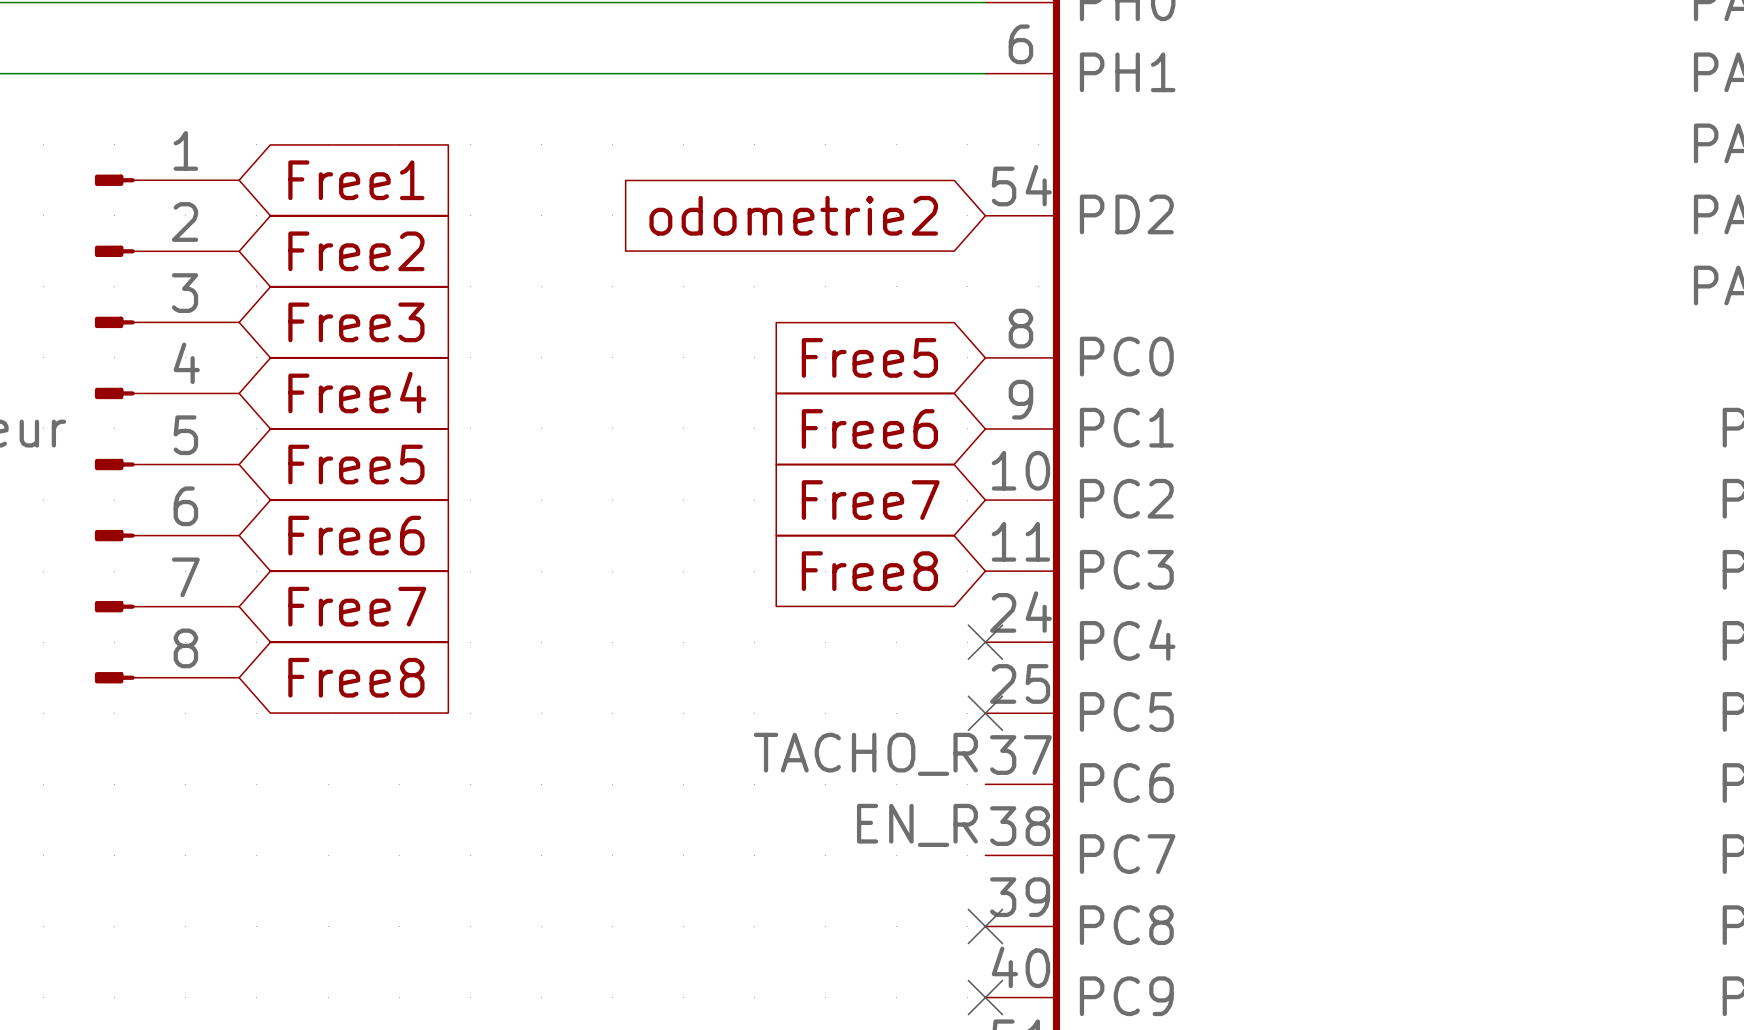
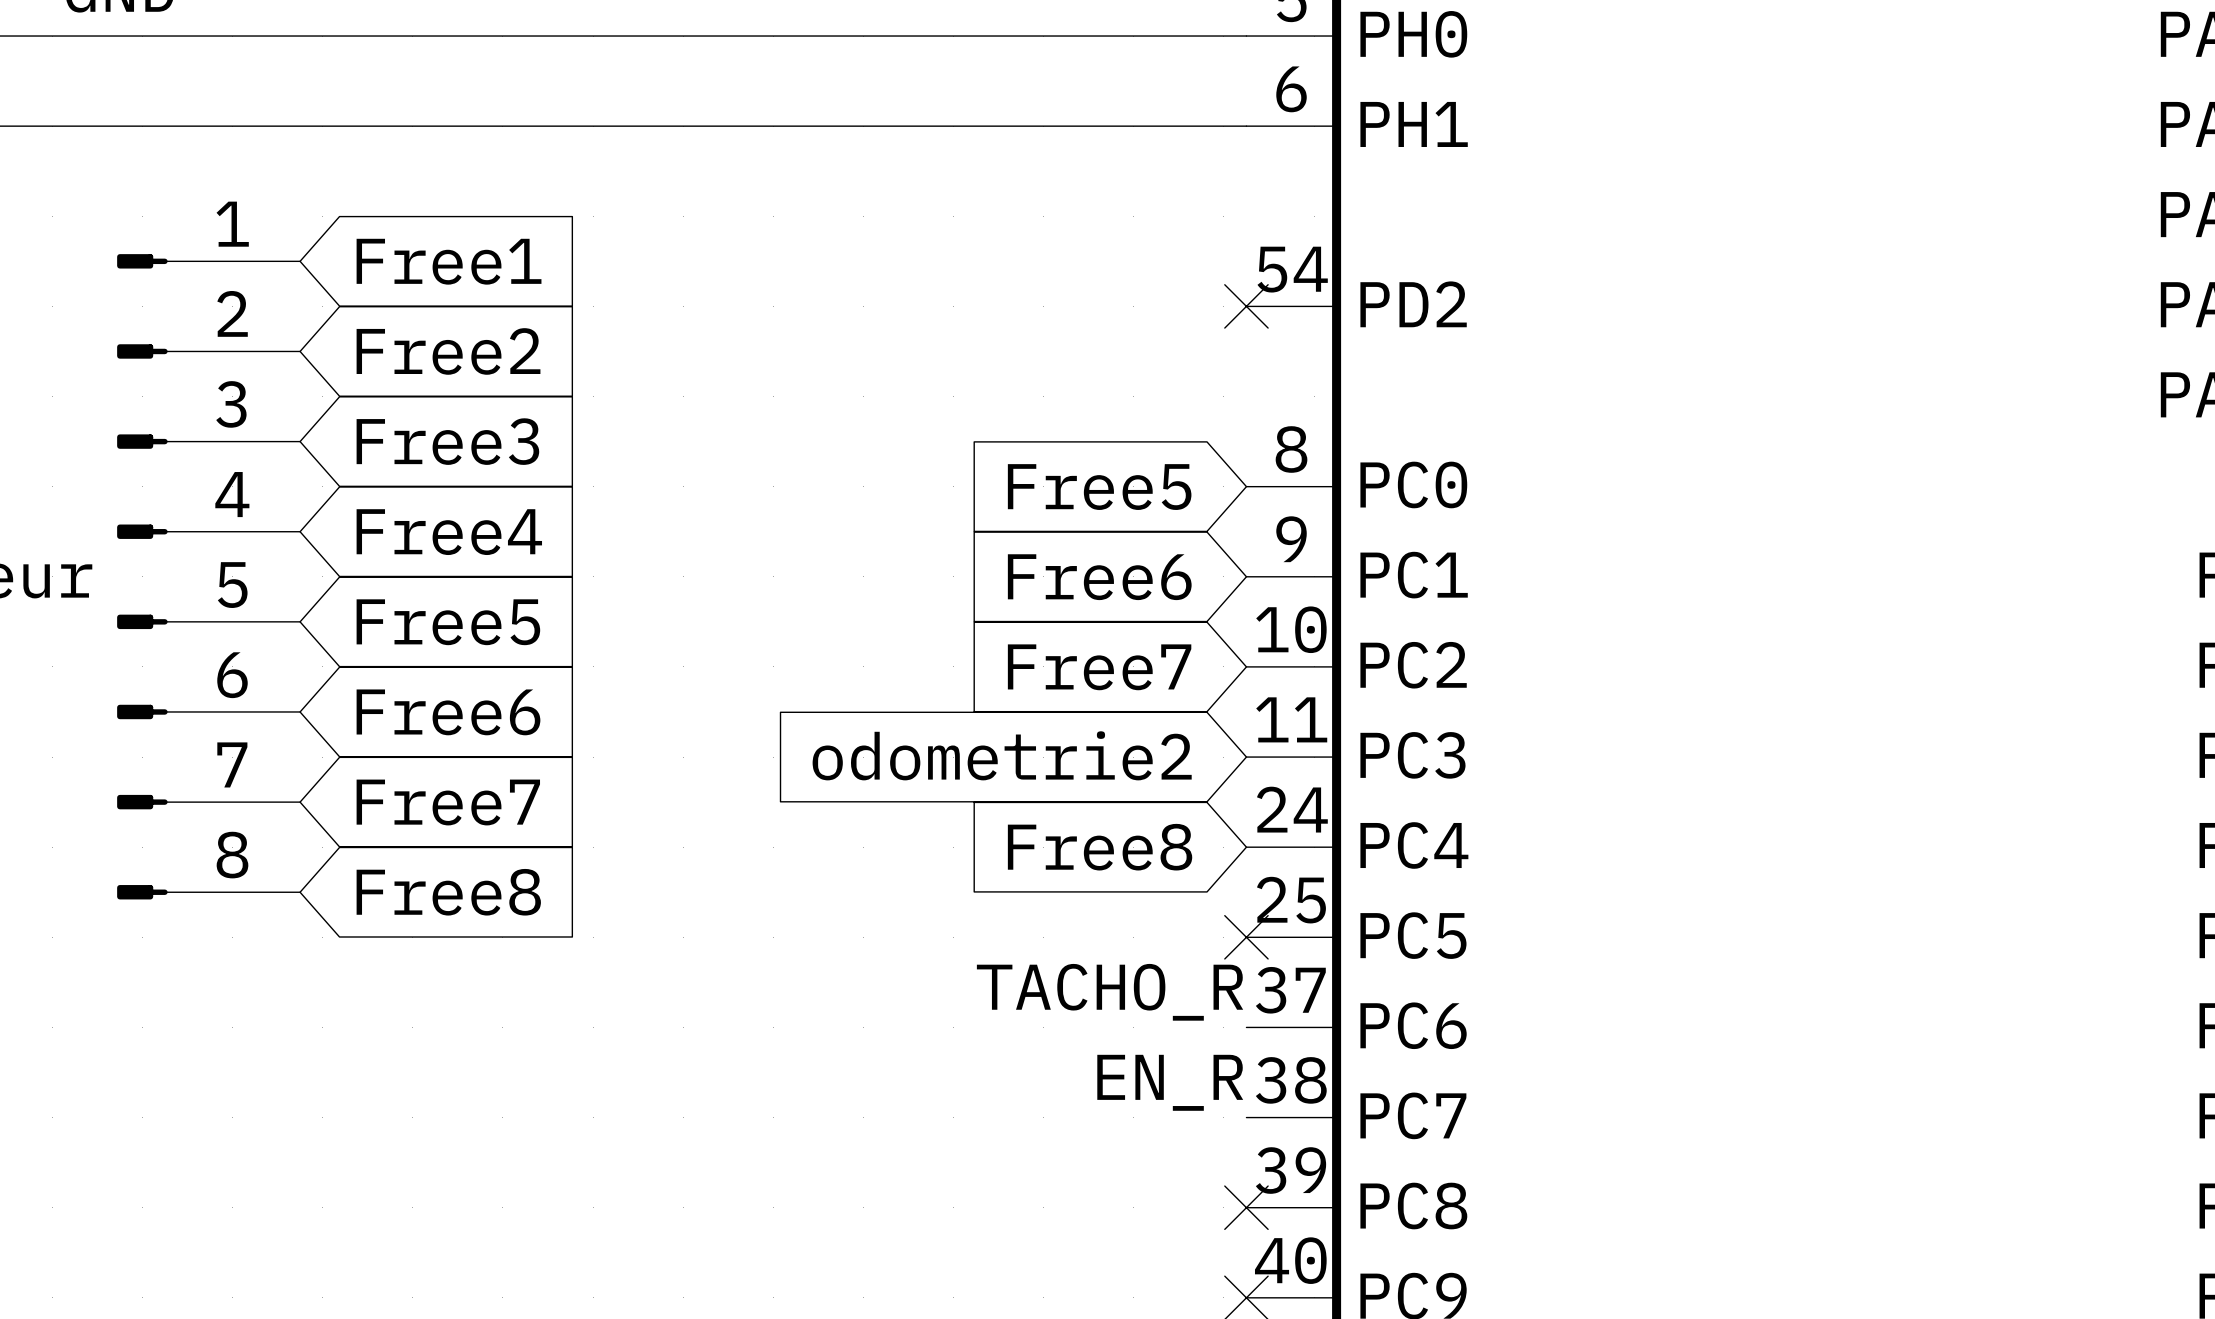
global label: odometrie2 (793, 215) -> none
no-connect mark: none -> (1246, 306)
global label: Free8 (869, 571) -> odometrie2 (1002, 755)
global label: none -> Free8 (1100, 847)
no-connect mark: (985, 642) -> none

